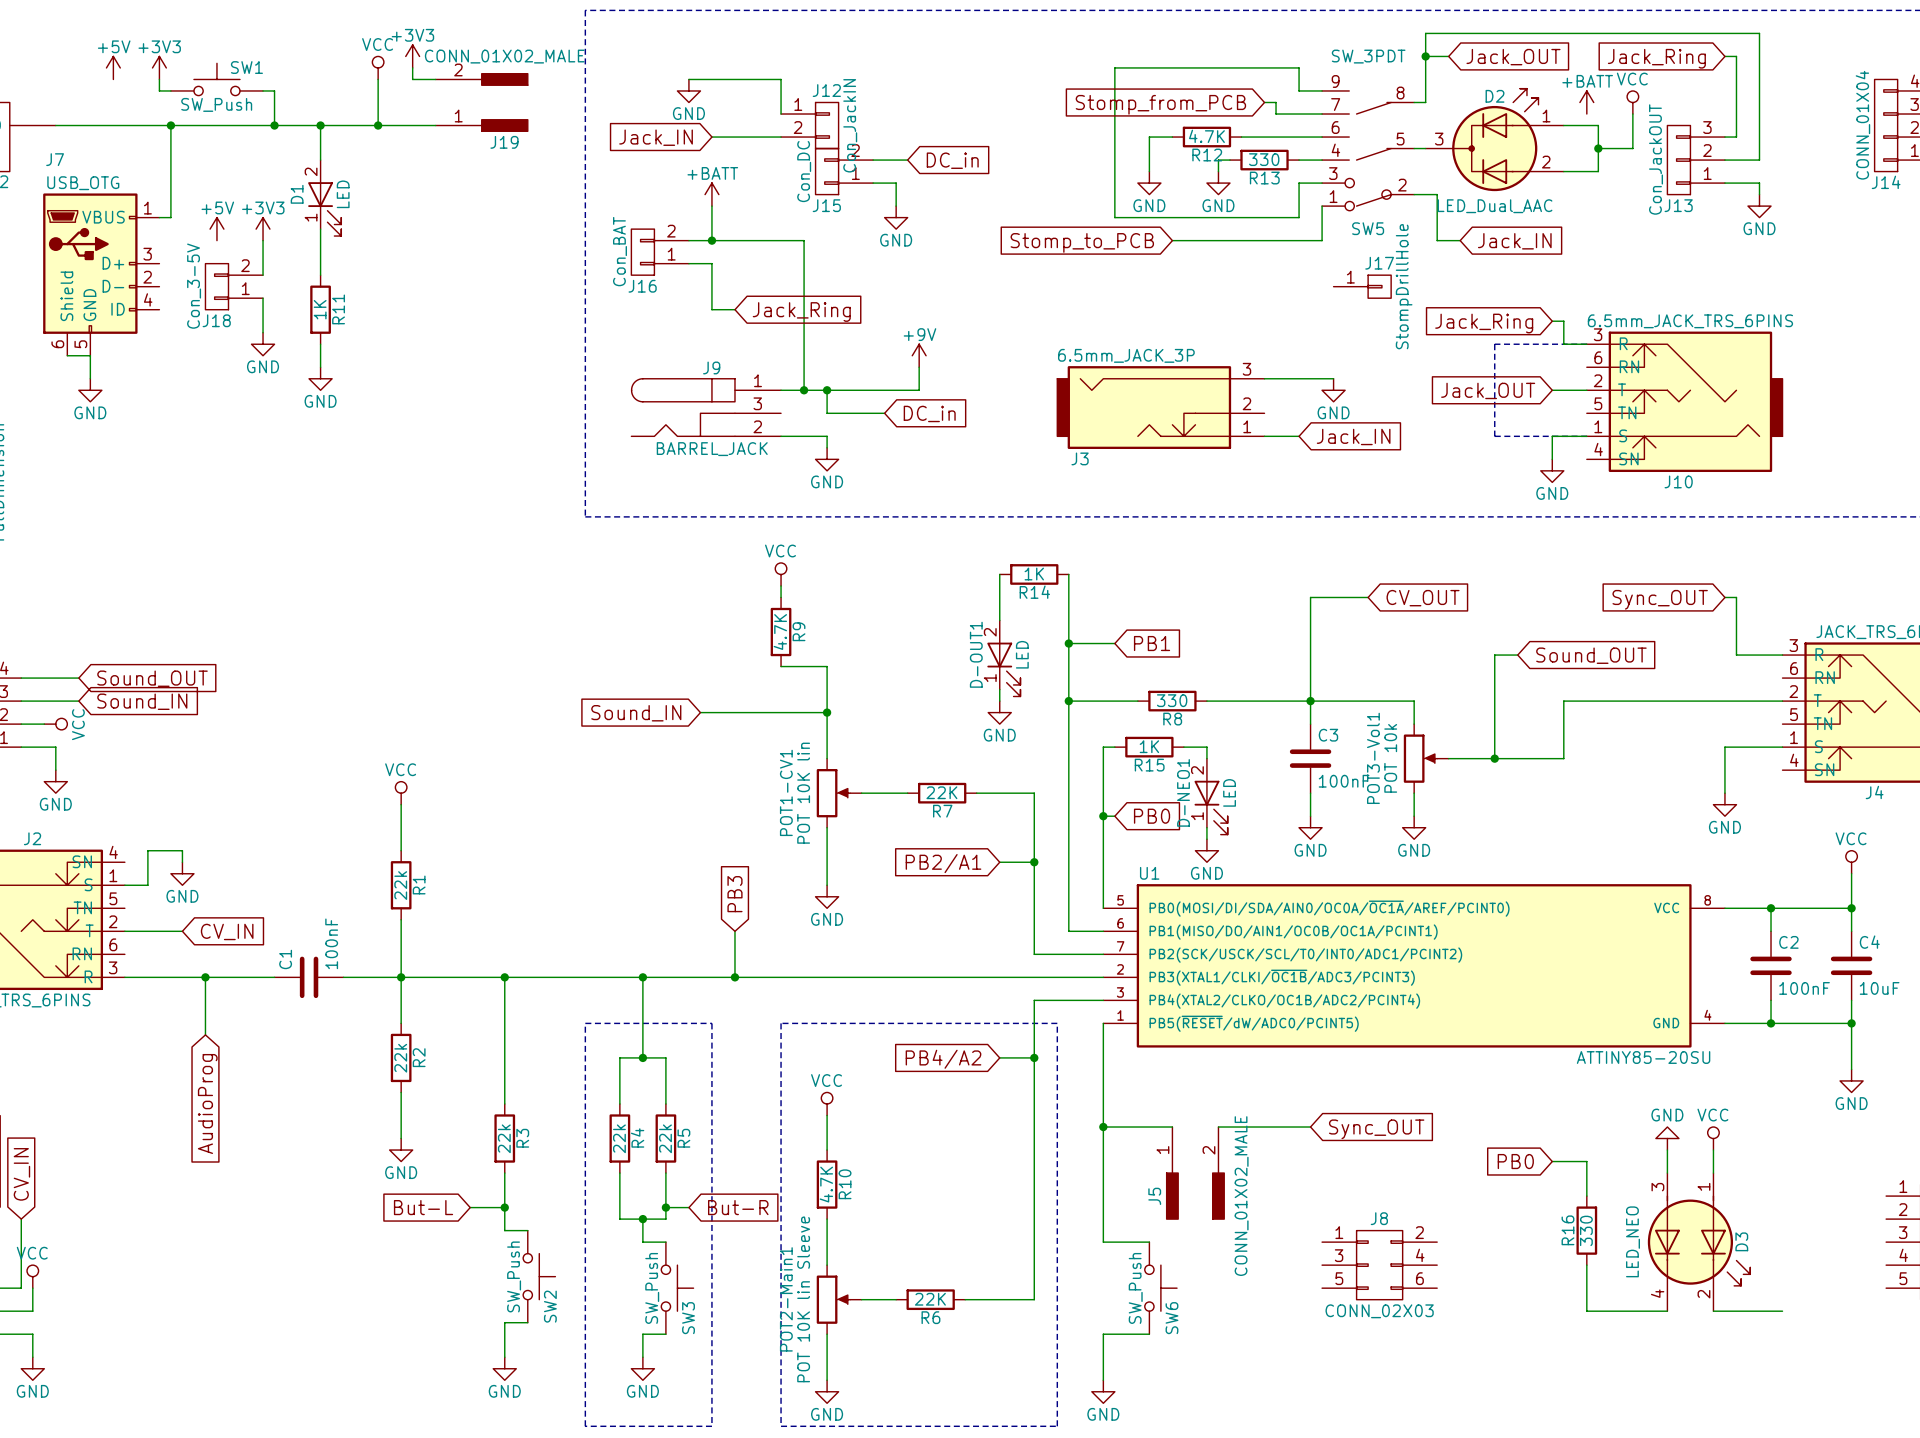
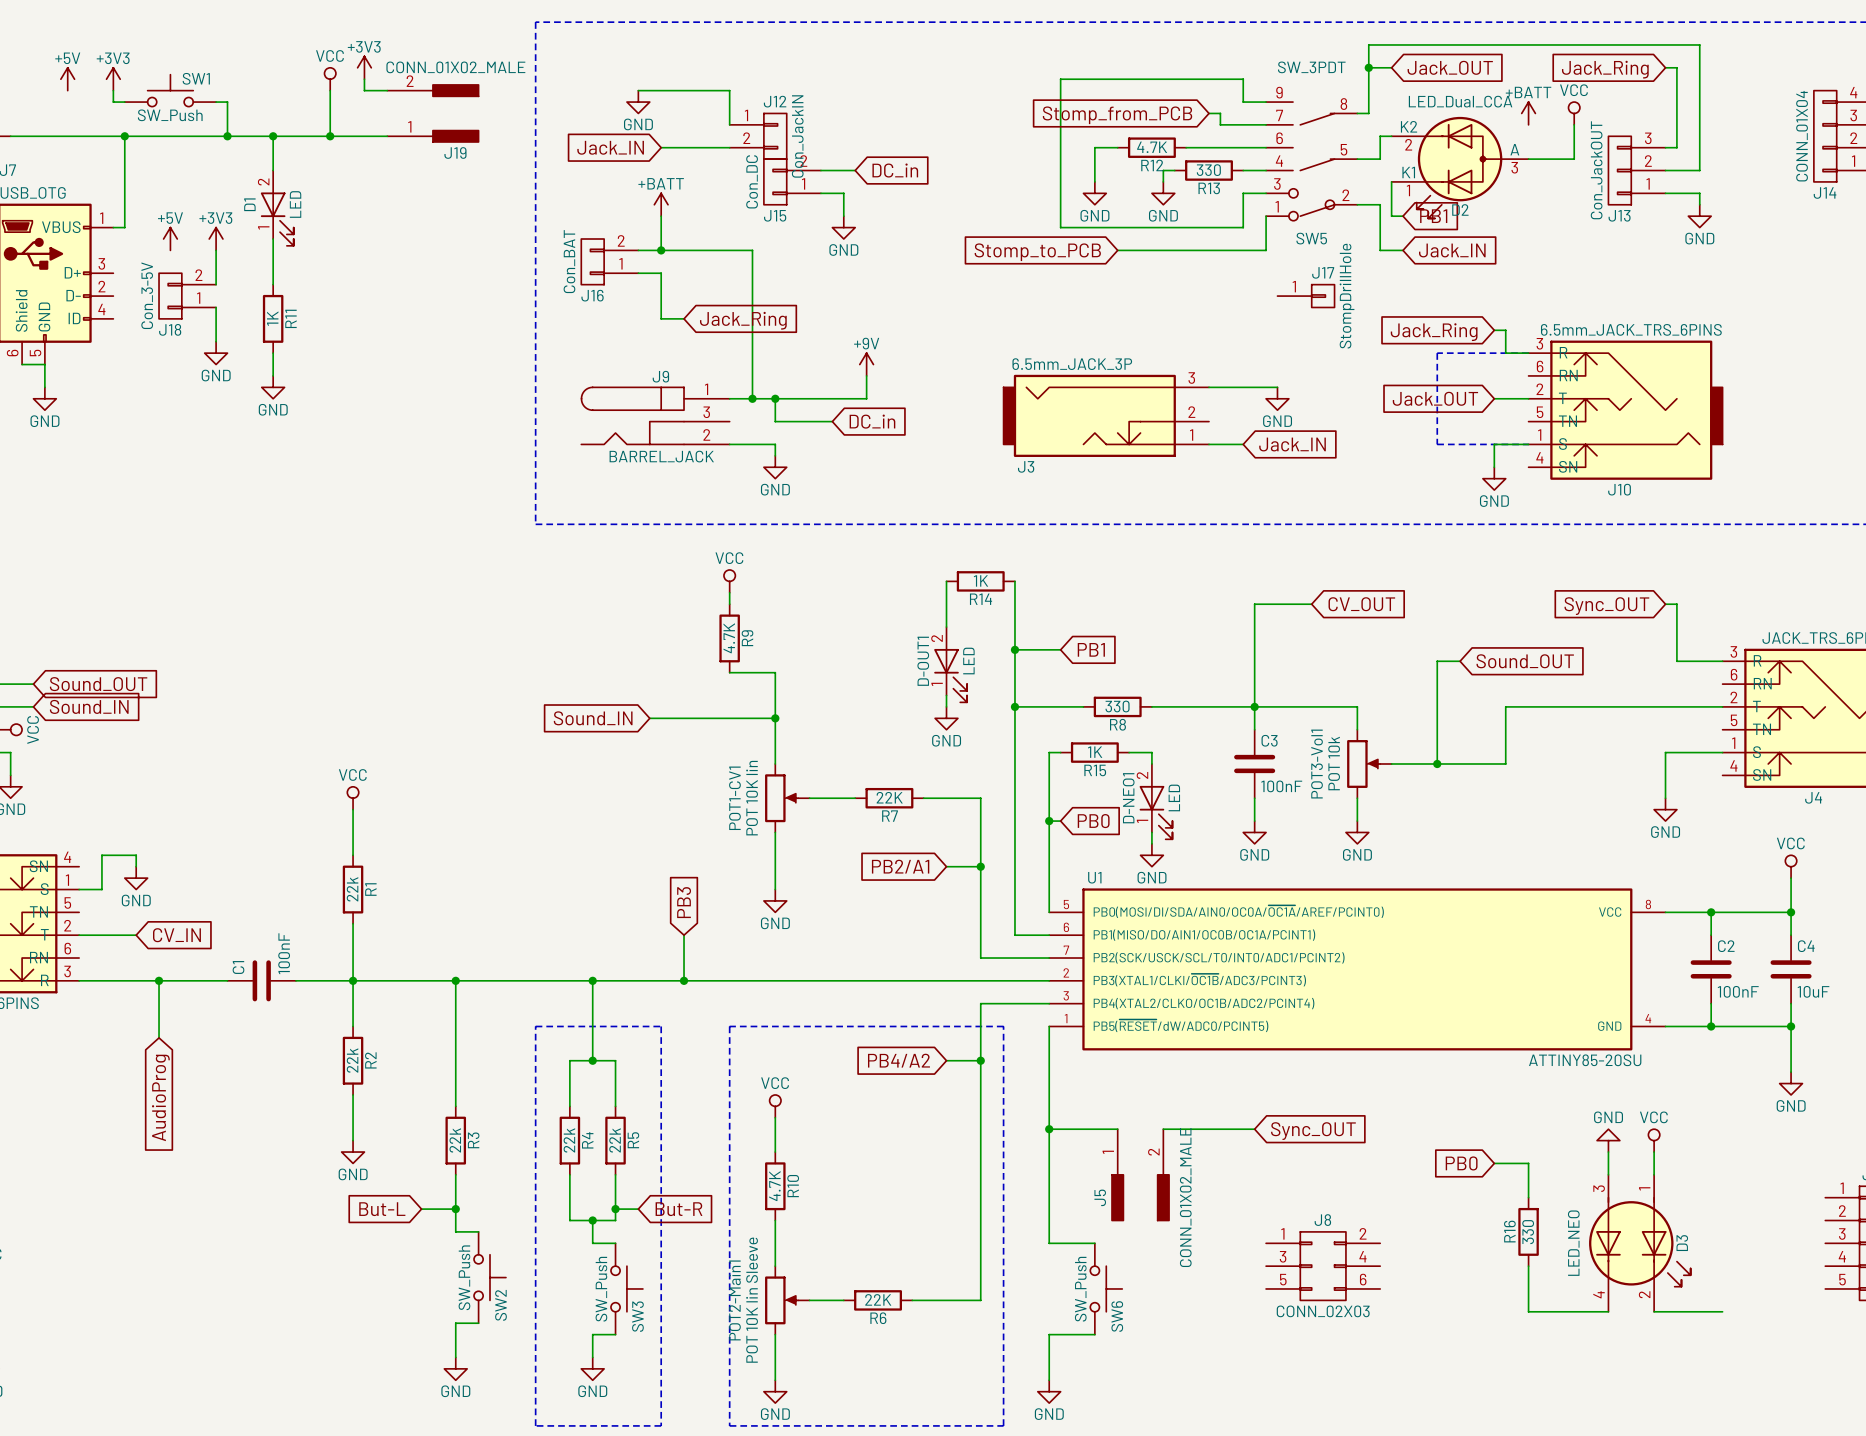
D2 symbol: [1425, 88, 1564, 192] -> [1391, 116, 1529, 219]
D2 name position: D2 (1495, 96) -> D2 (1460, 209)
wire: none -> (1391, 136) (1380, 136) (1380, 159) (1368, 159)
wire: (1563, 125) (1598, 125) (1598, 171) (1563, 171) -> none
wire: none -> (1528, 159) (1539, 159)
junction: (1598, 148) -> none
wire: none -> (1391, 181) (1391, 216) (1403, 216)
D2 value: LED_Dual_AAC (1495, 206) -> LED_Dual_CCA (1460, 101)
global label: none -> PB1 (1433, 216)

